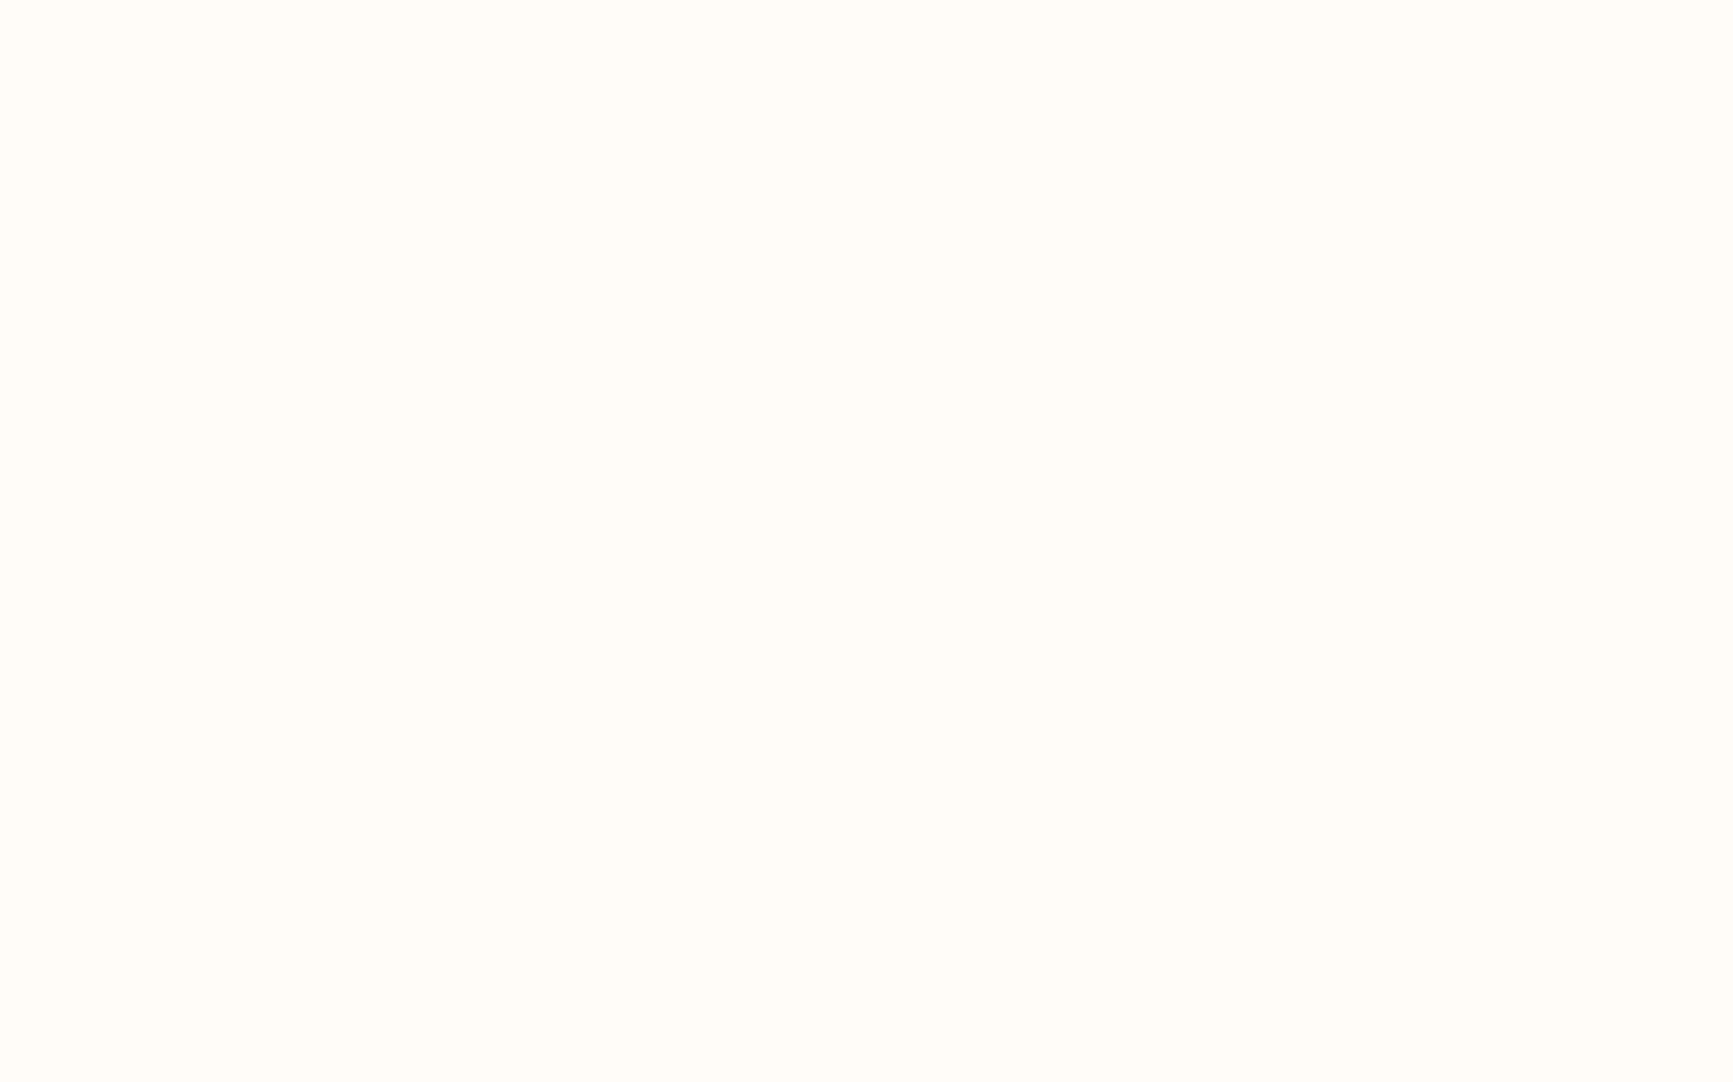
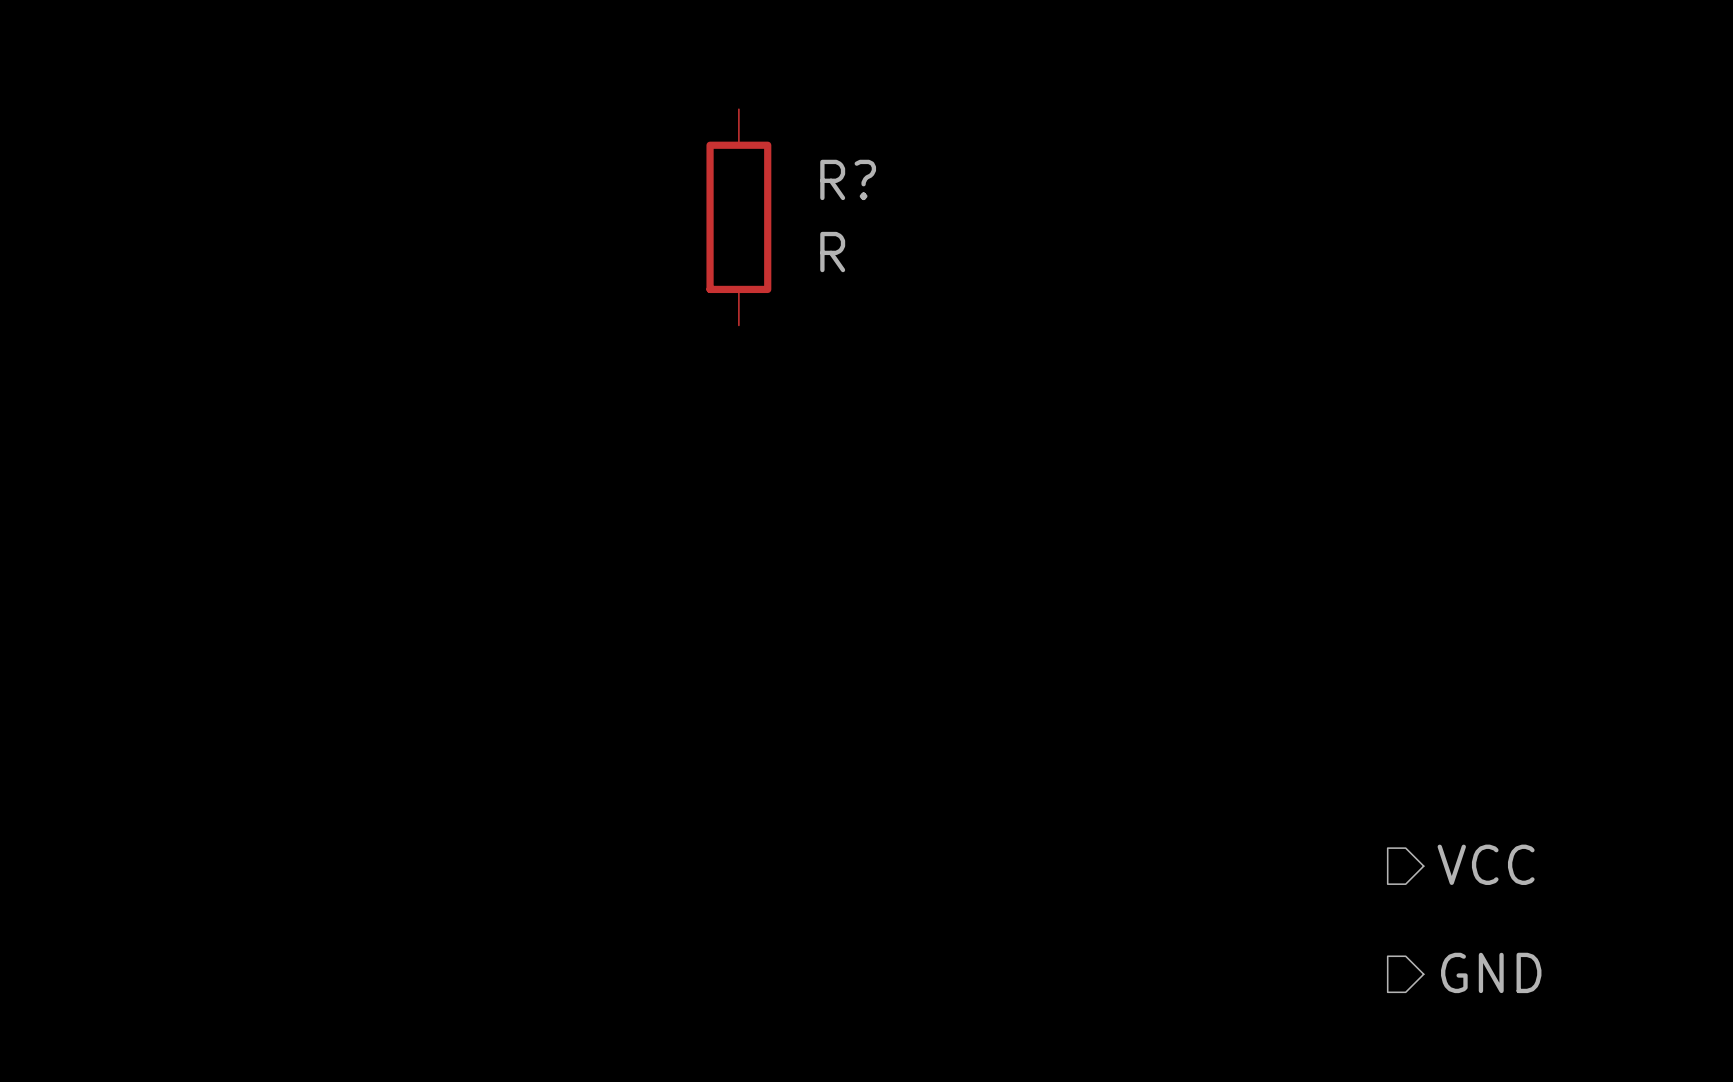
R?: none -> R (738, 217)
sheet pin: none -> VCC (1486, 864)
sheet pin: none -> GND (1491, 972)

